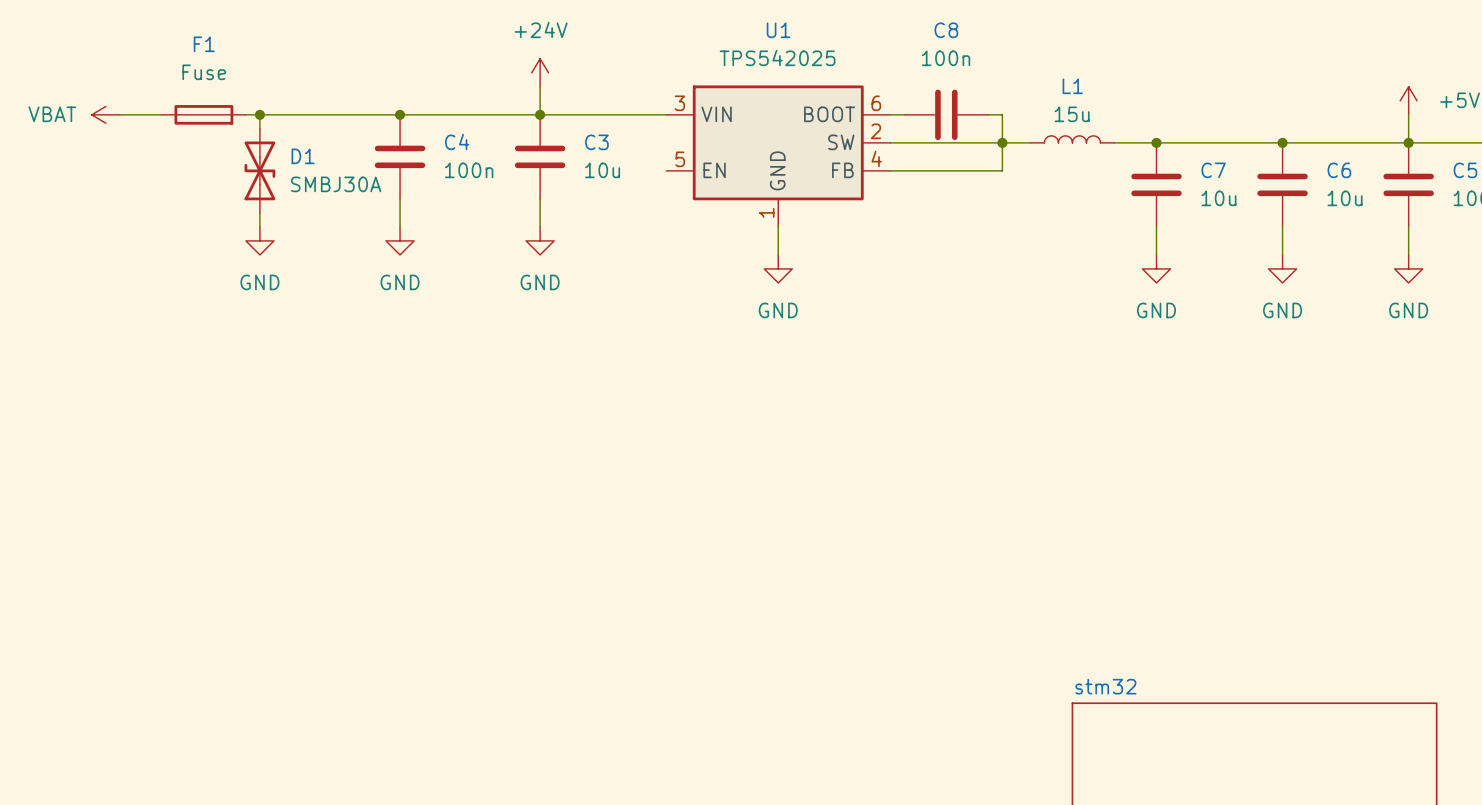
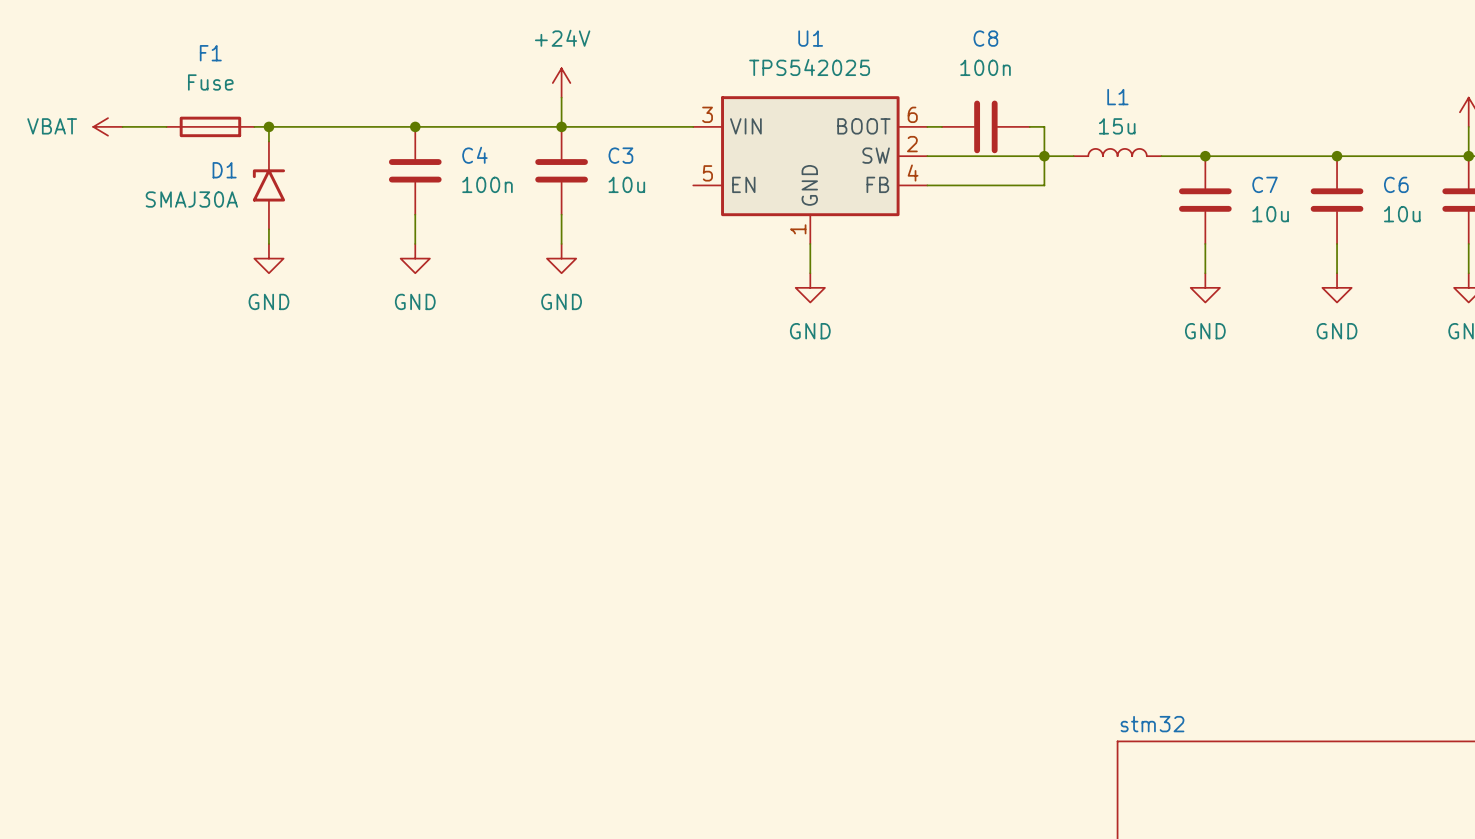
D1 symbol: [244, 128, 276, 213] -> [252, 141, 286, 230]
D1 name position: D1 (303, 156) -> D1 (224, 170)
D1 value: SMBJ30A (336, 184) -> SMAJ30A (191, 199)

